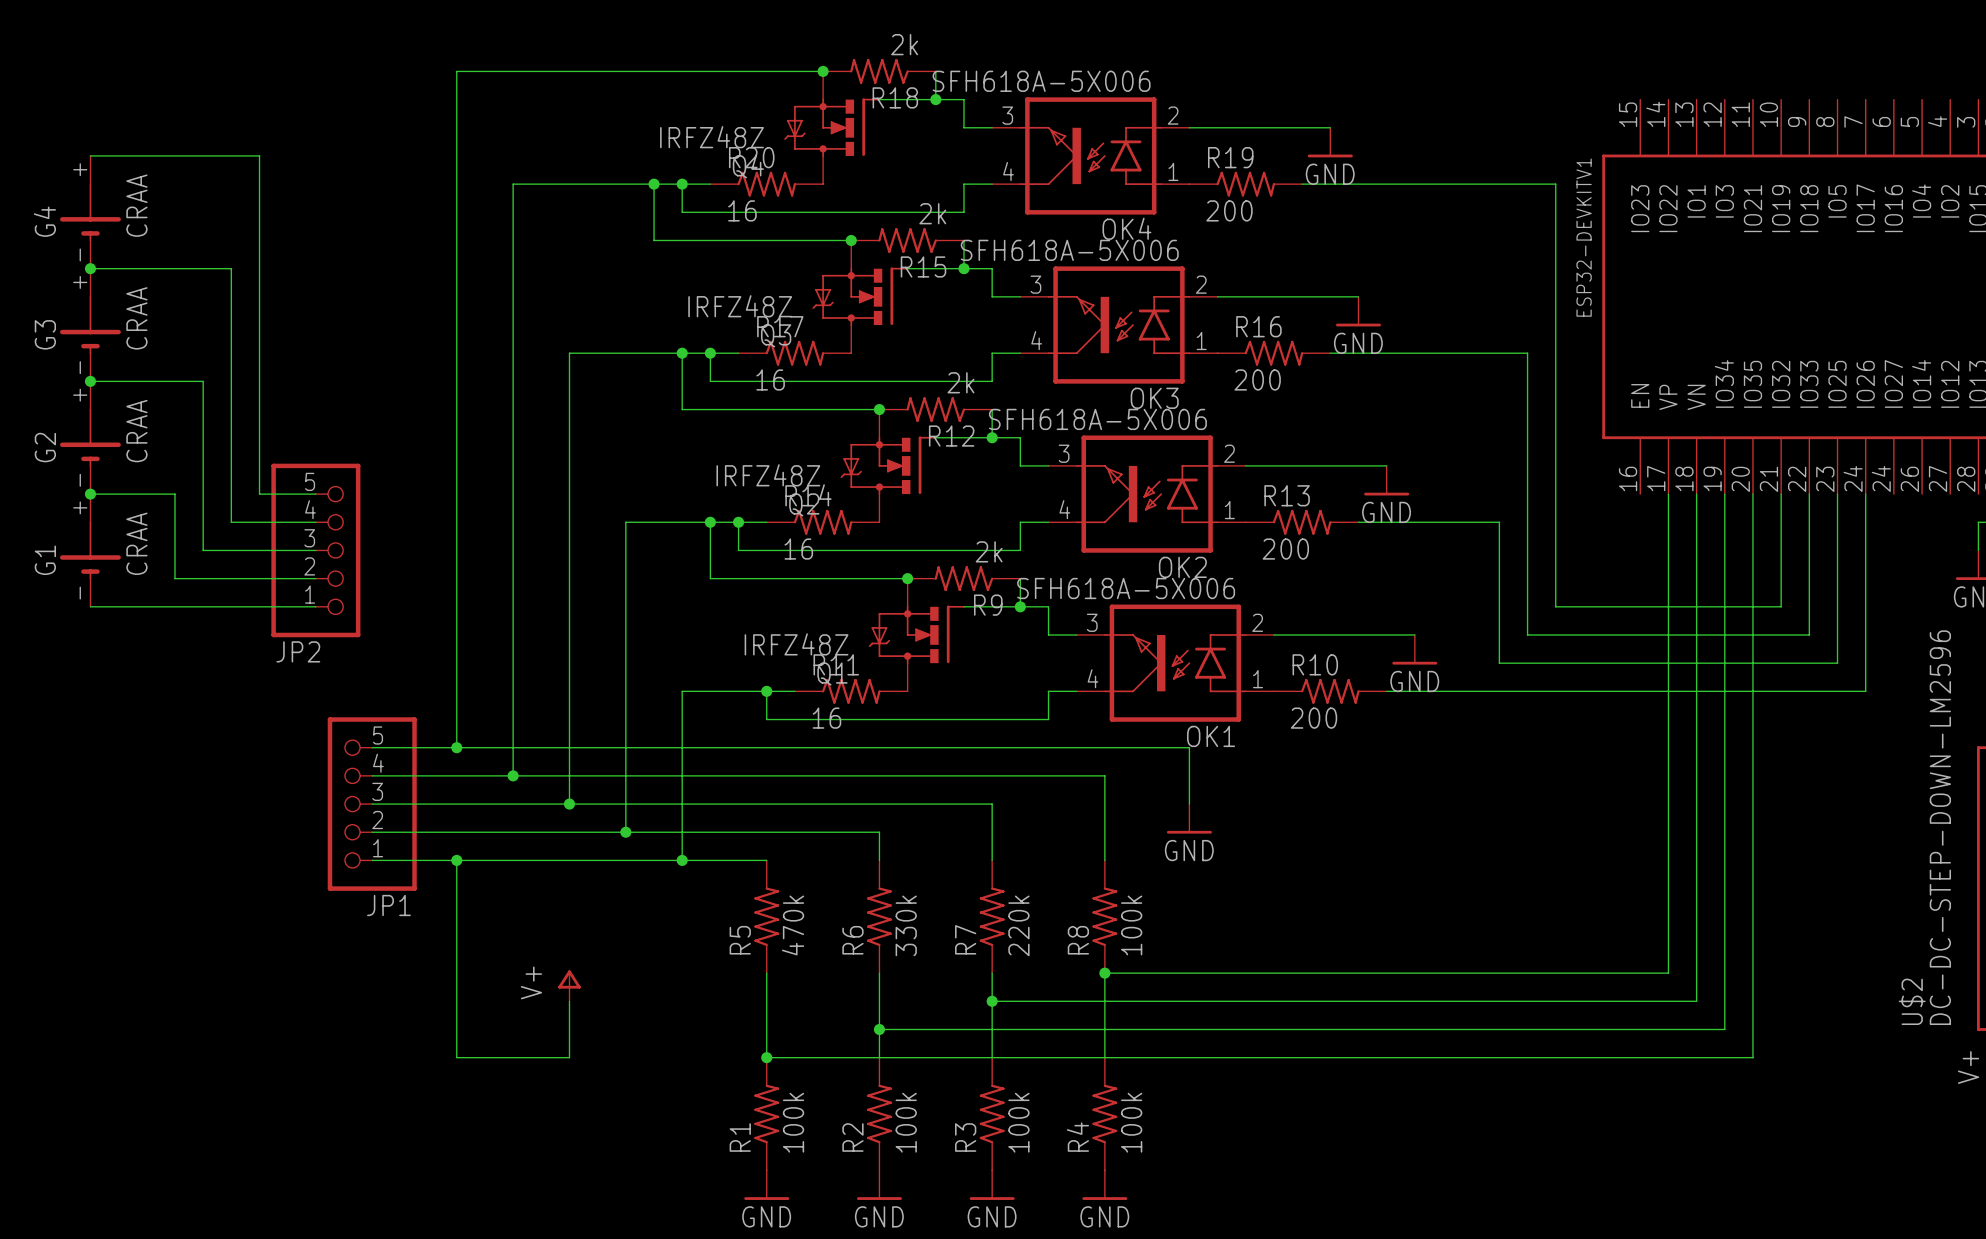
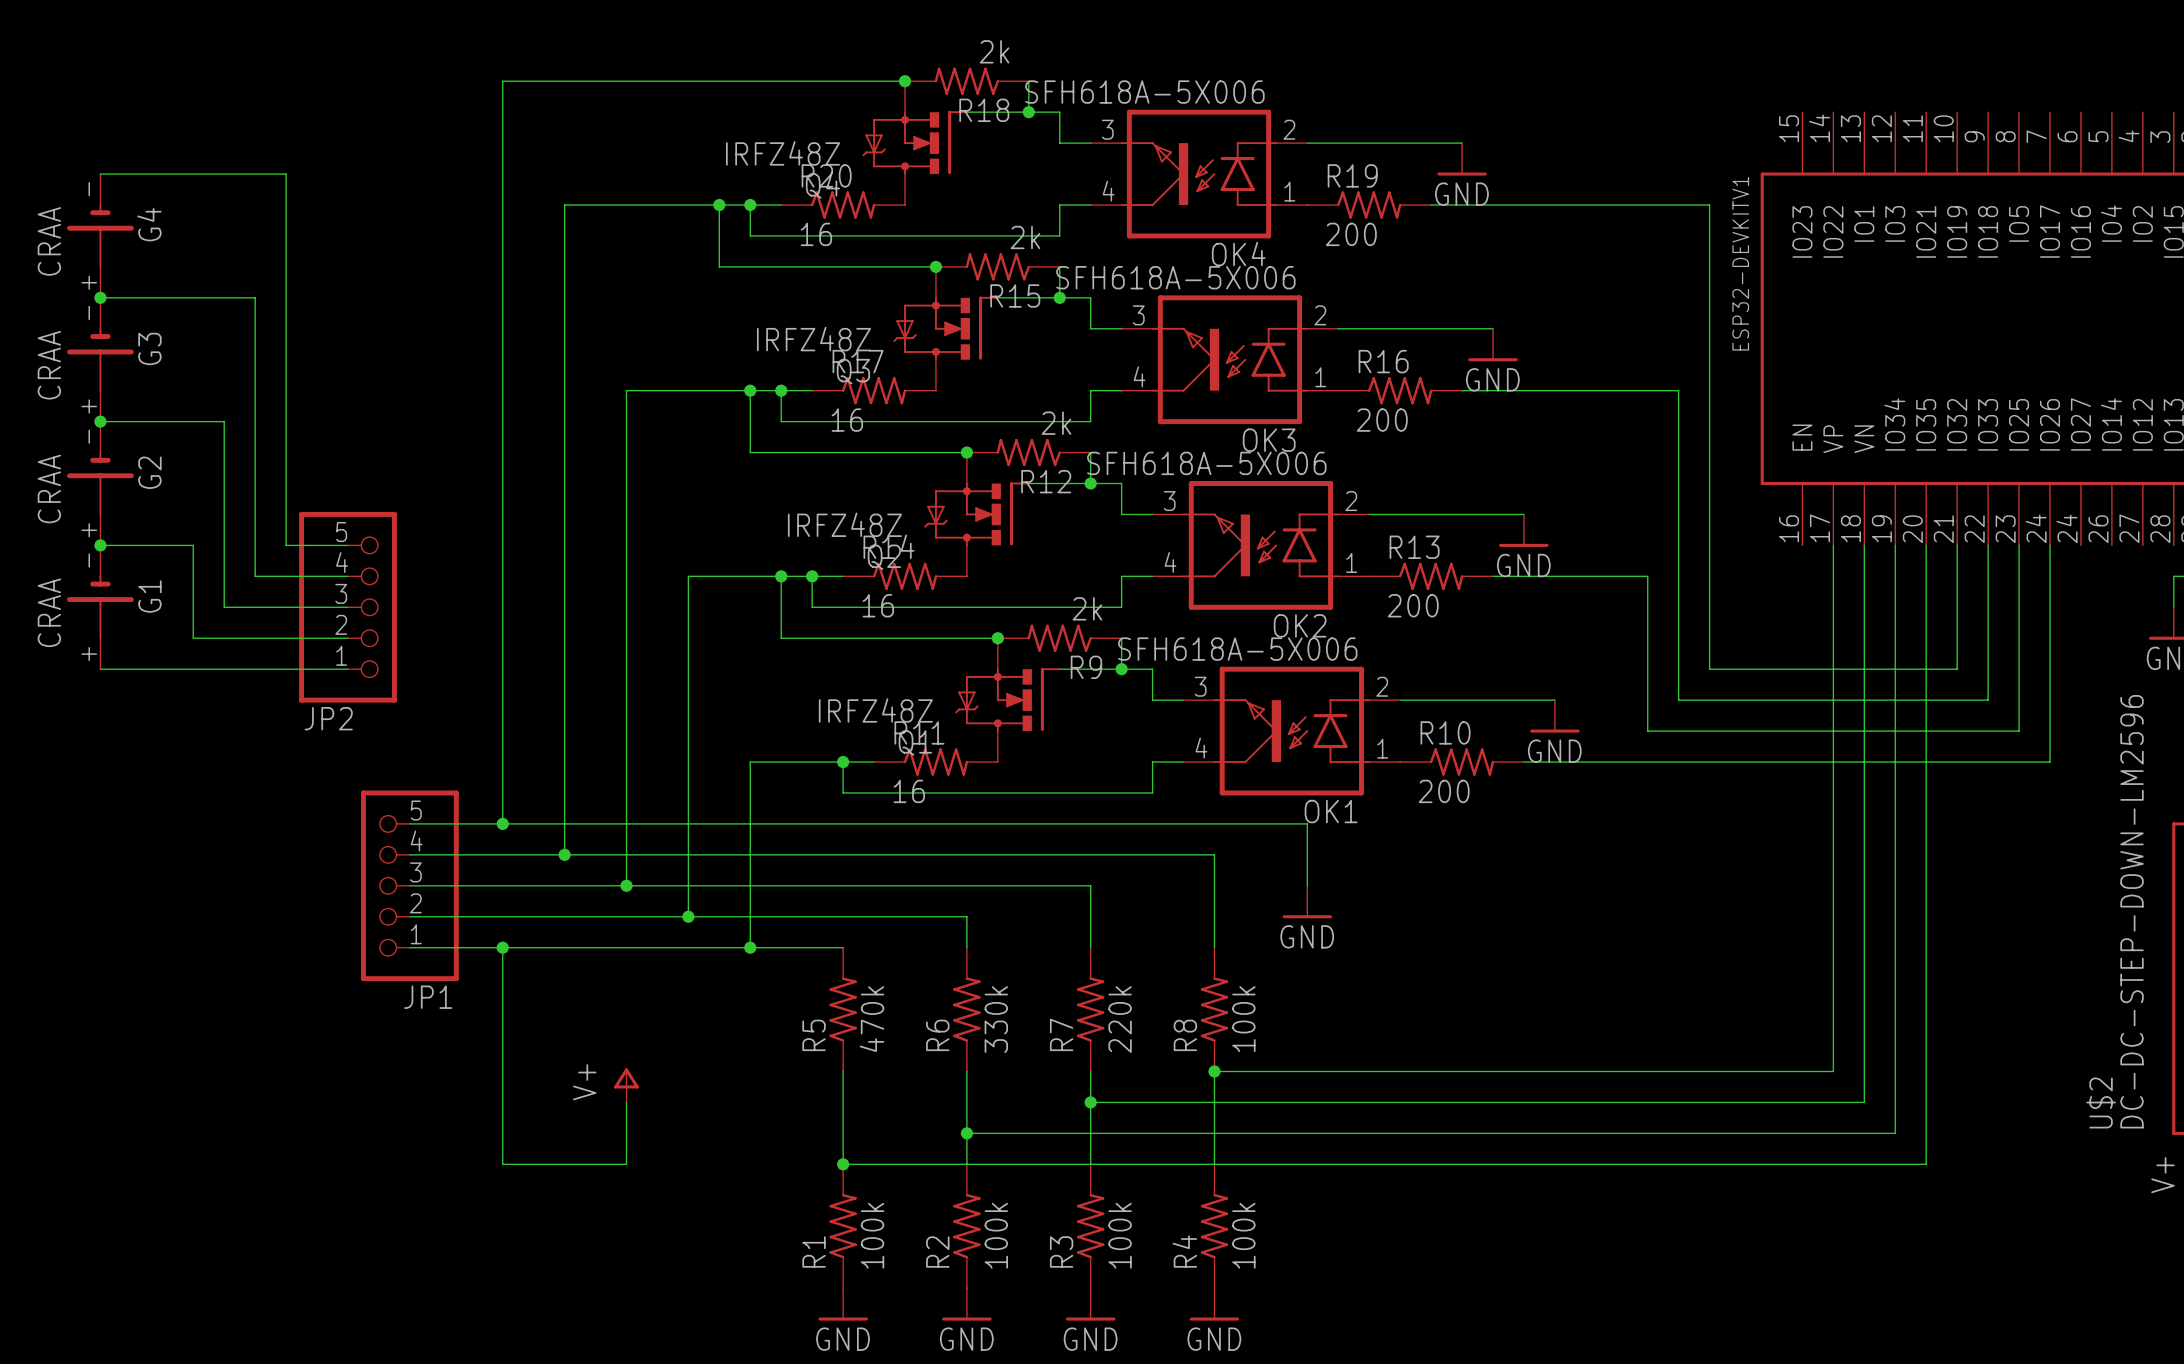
G4 rotation: 0° (90, 212) -> 180° (100, 235)
G3 rotation: 0° (90, 325) -> 180° (100, 359)
G2 rotation: 0° (90, 437) -> 180° (100, 483)
G1 rotation: 0° (90, 550) -> 180° (100, 607)

